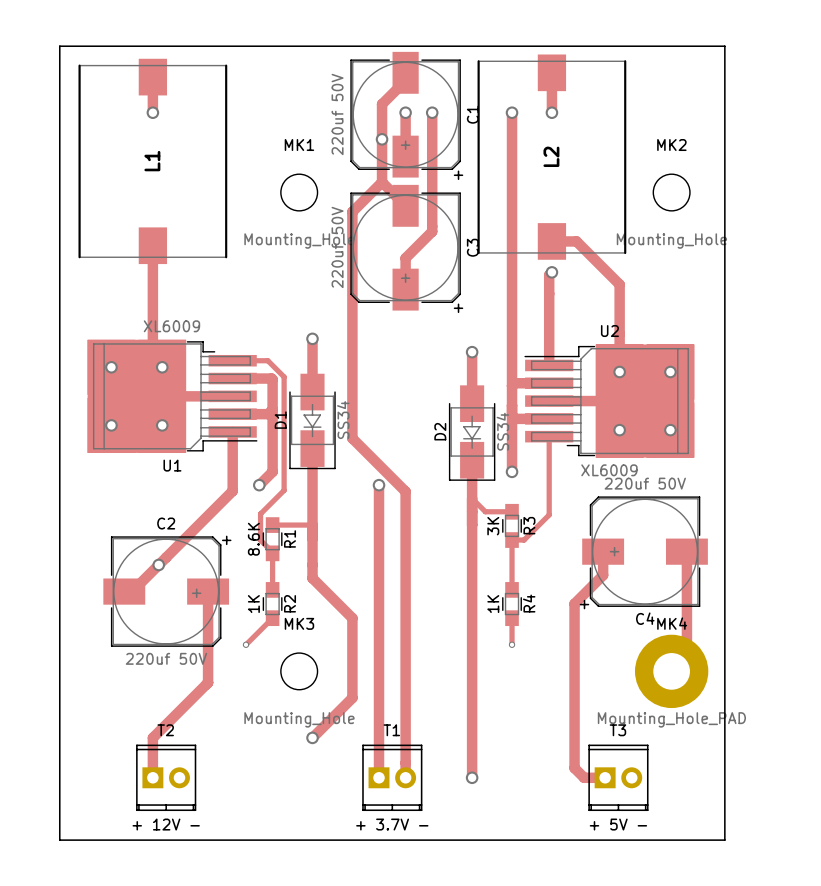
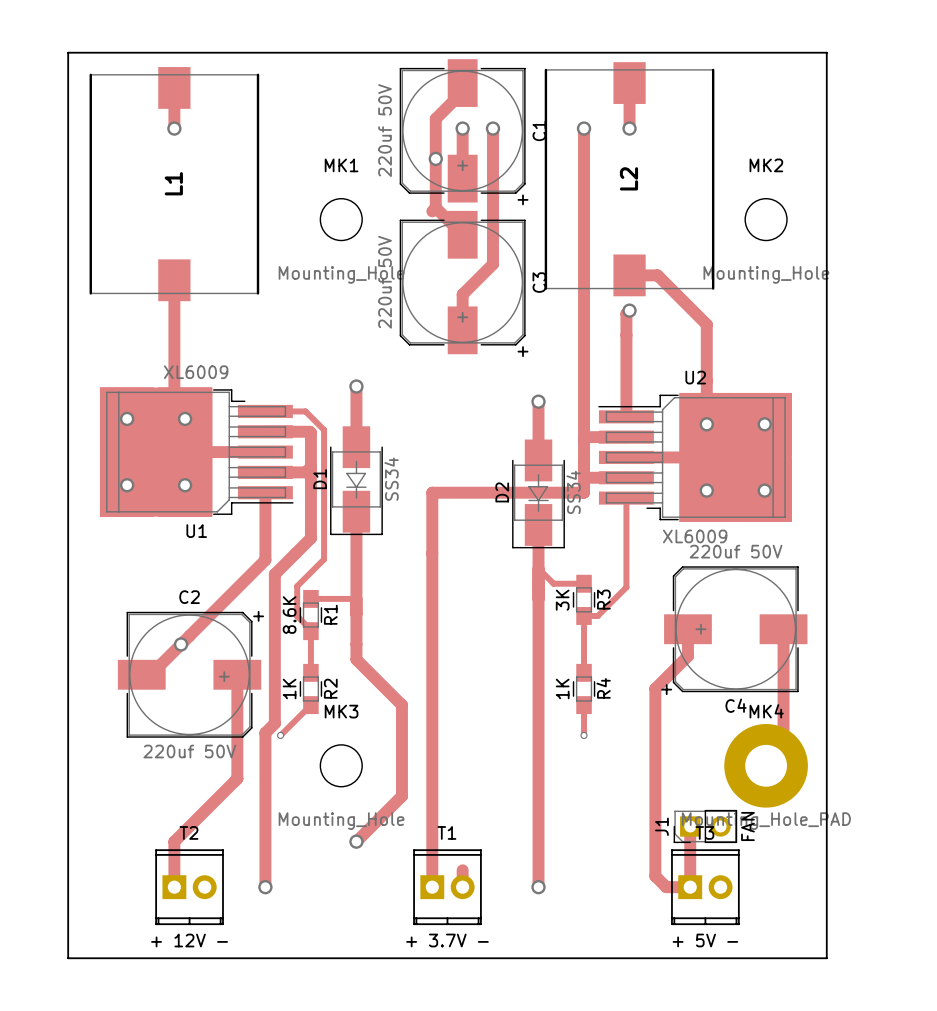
track: (379, 185) (352, 211) (352, 438) (405, 491) (405, 762) -> none
track: (512, 431) (512, 471) -> (584, 492) (432, 492) (432, 553)
via: (512, 471) -> none
track: none -> (295, 553) (274, 574) (274, 723) (265, 732) (265, 887)
via: (259, 485) -> none
via: (379, 485) -> none
track: none -> (690, 826) (690, 887)
J1: none -> FAN (705, 826)
via: none -> (265, 887)

